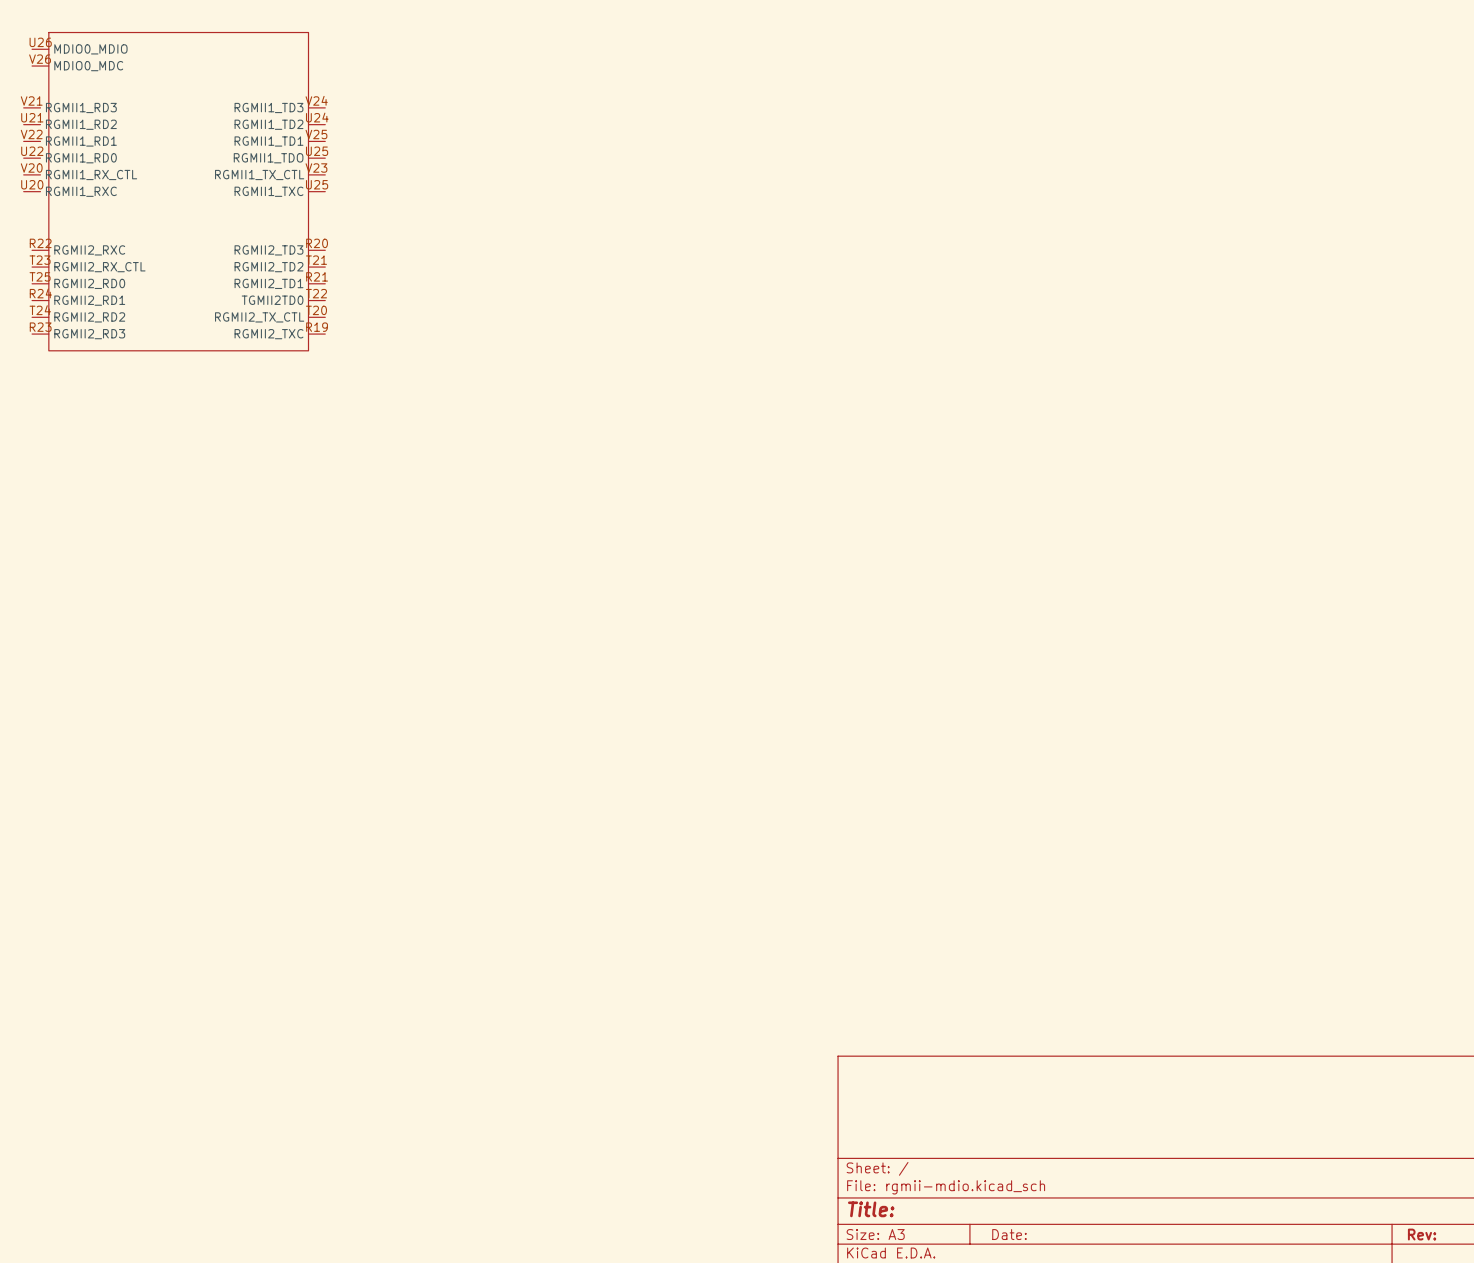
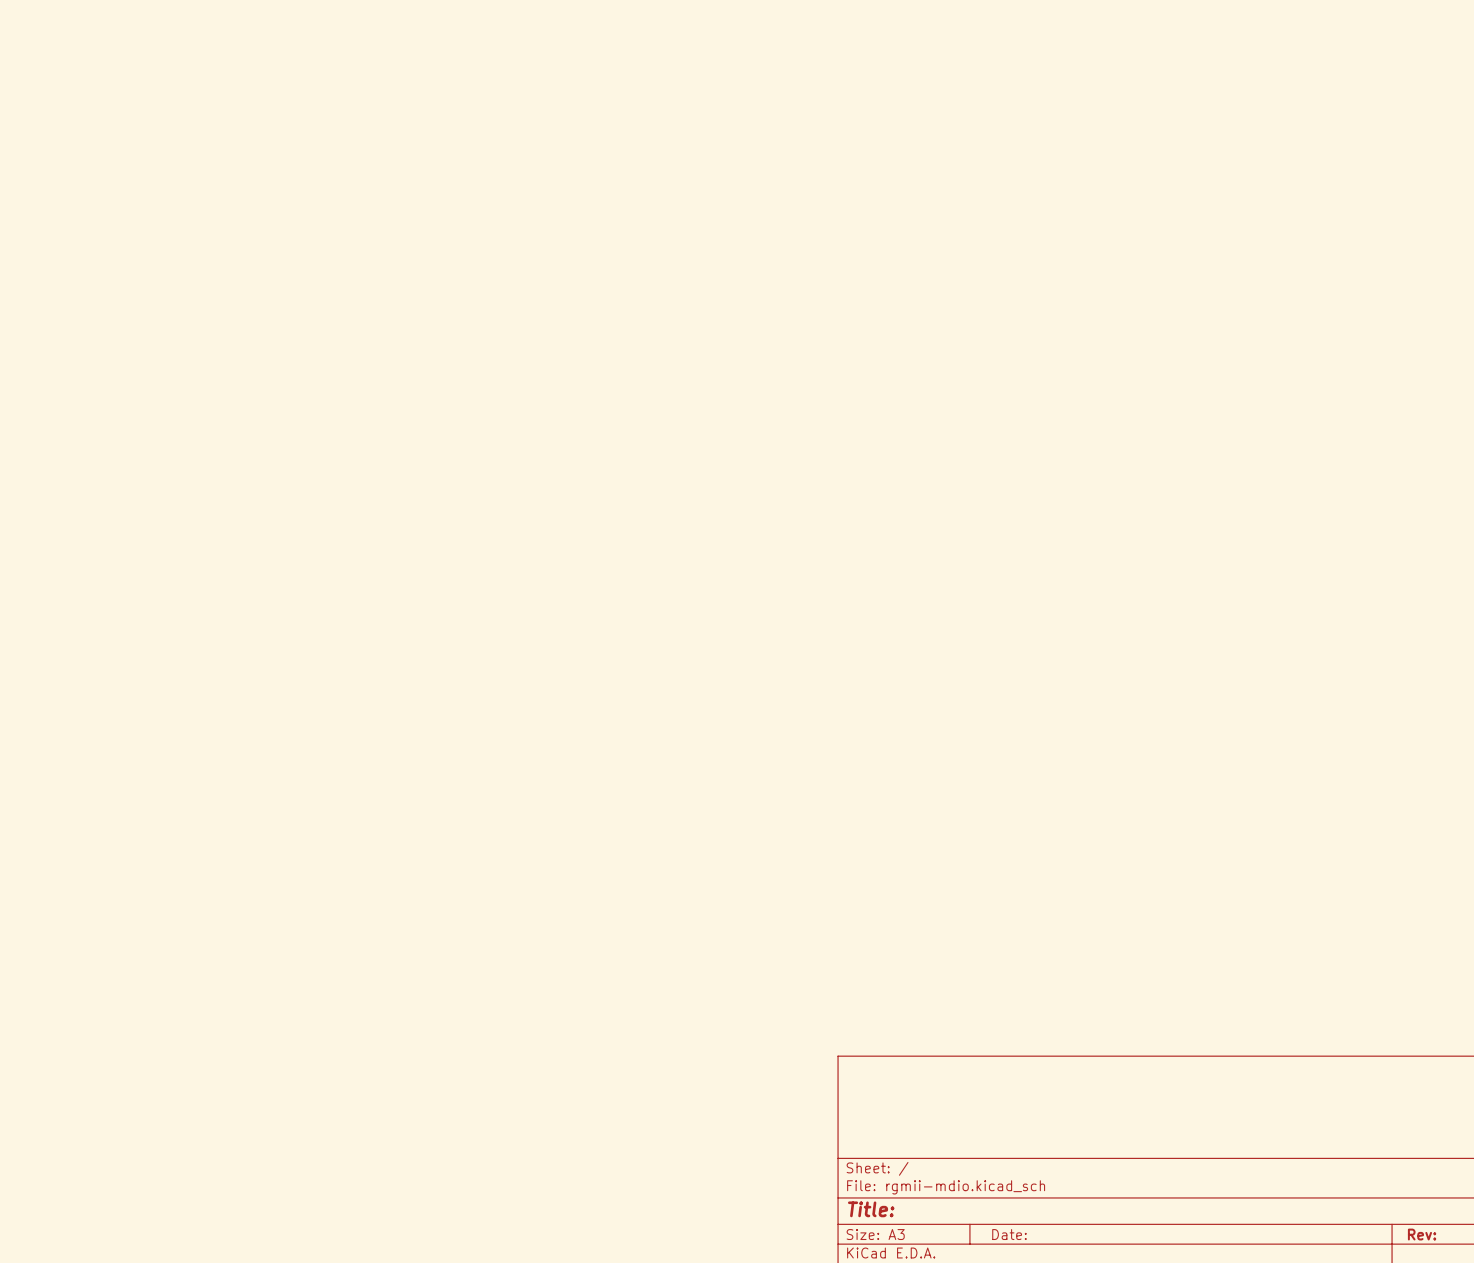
part: (174, 191) -> none

